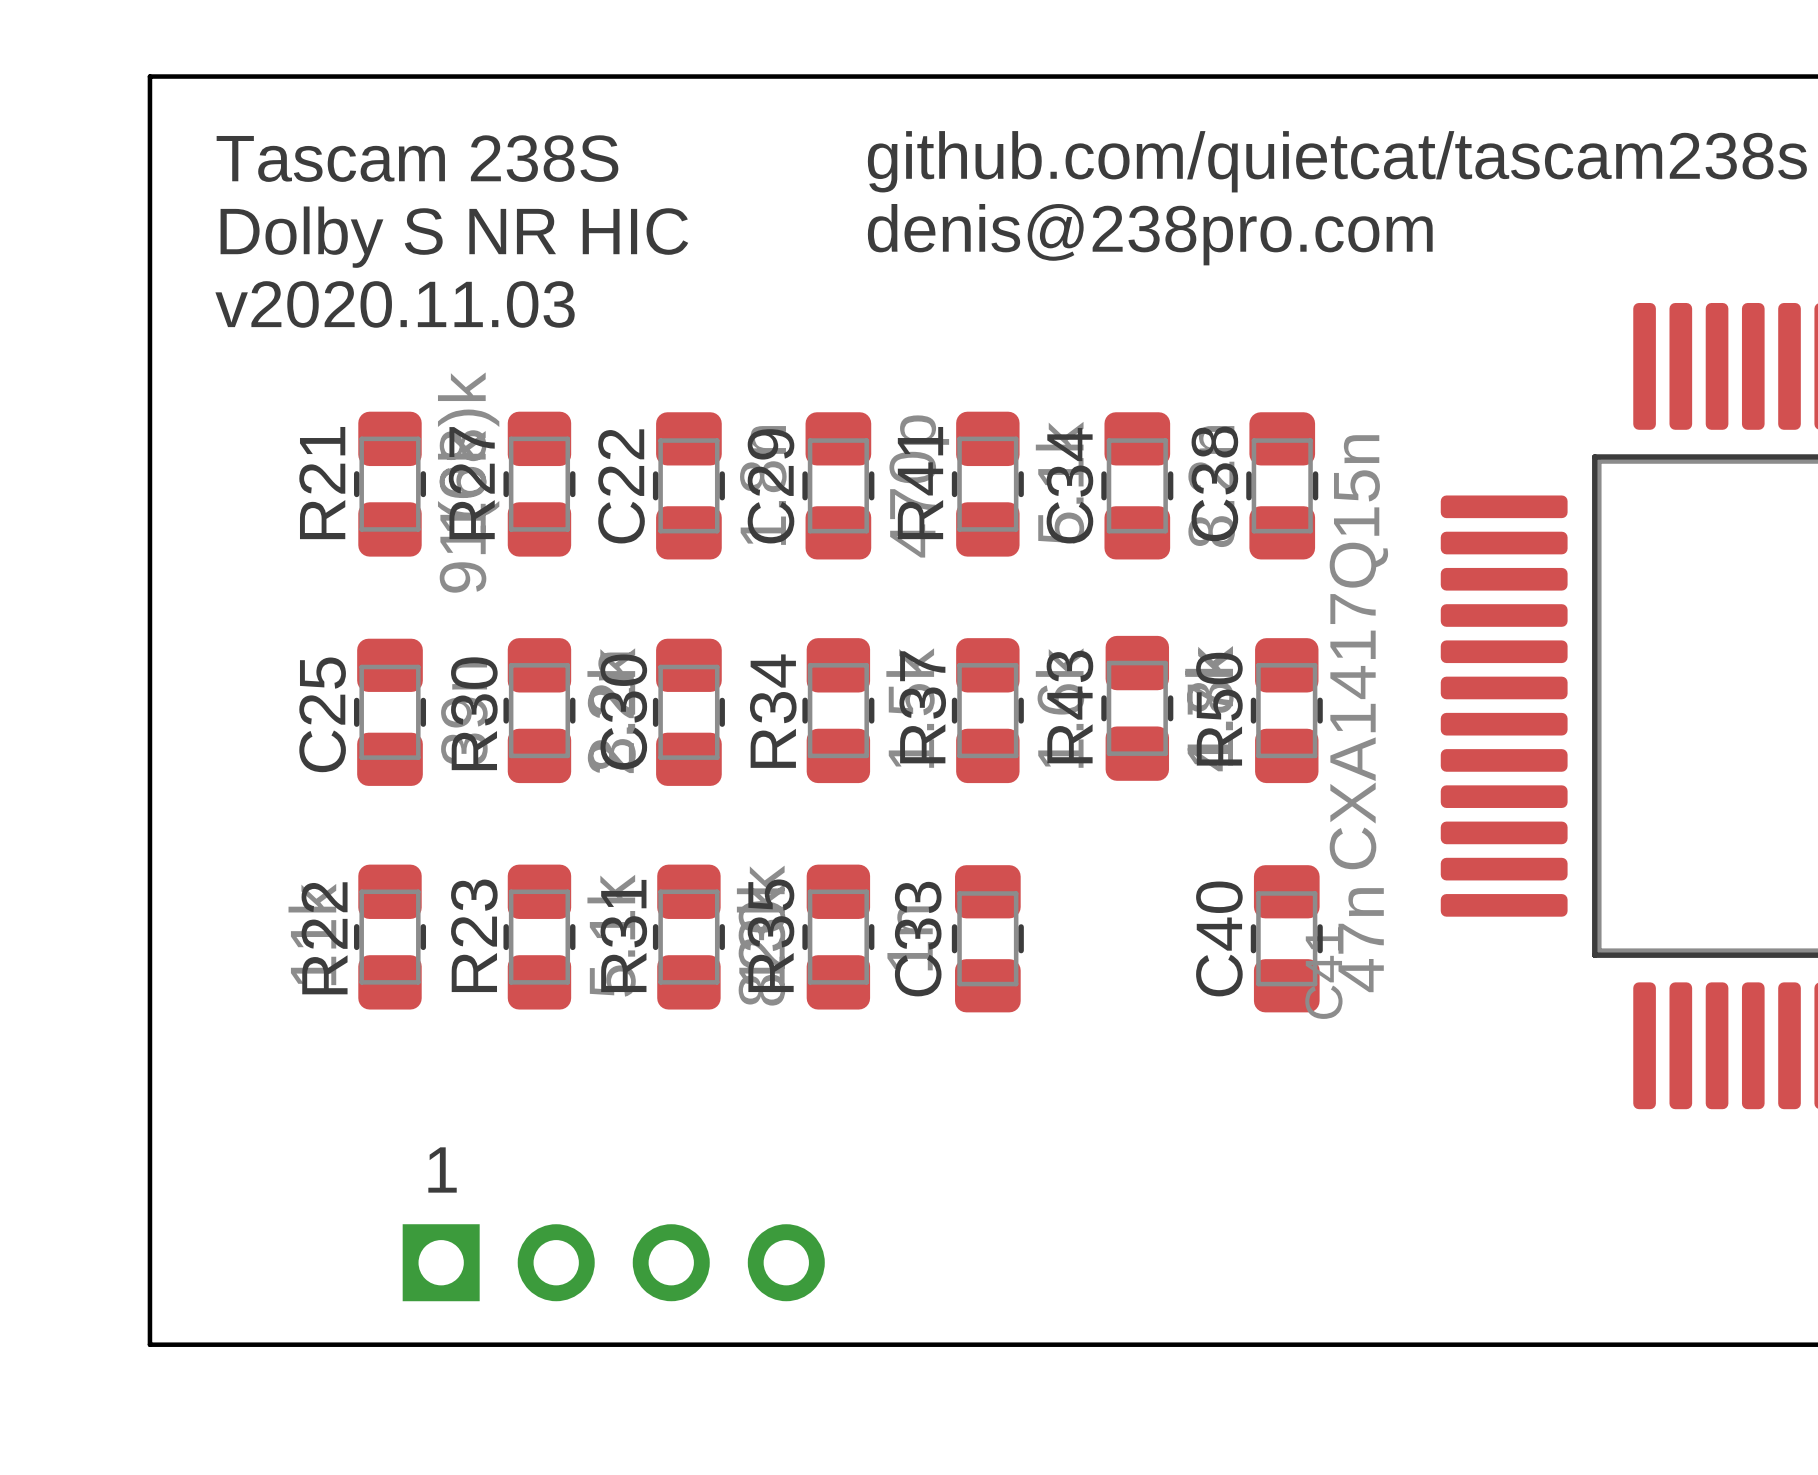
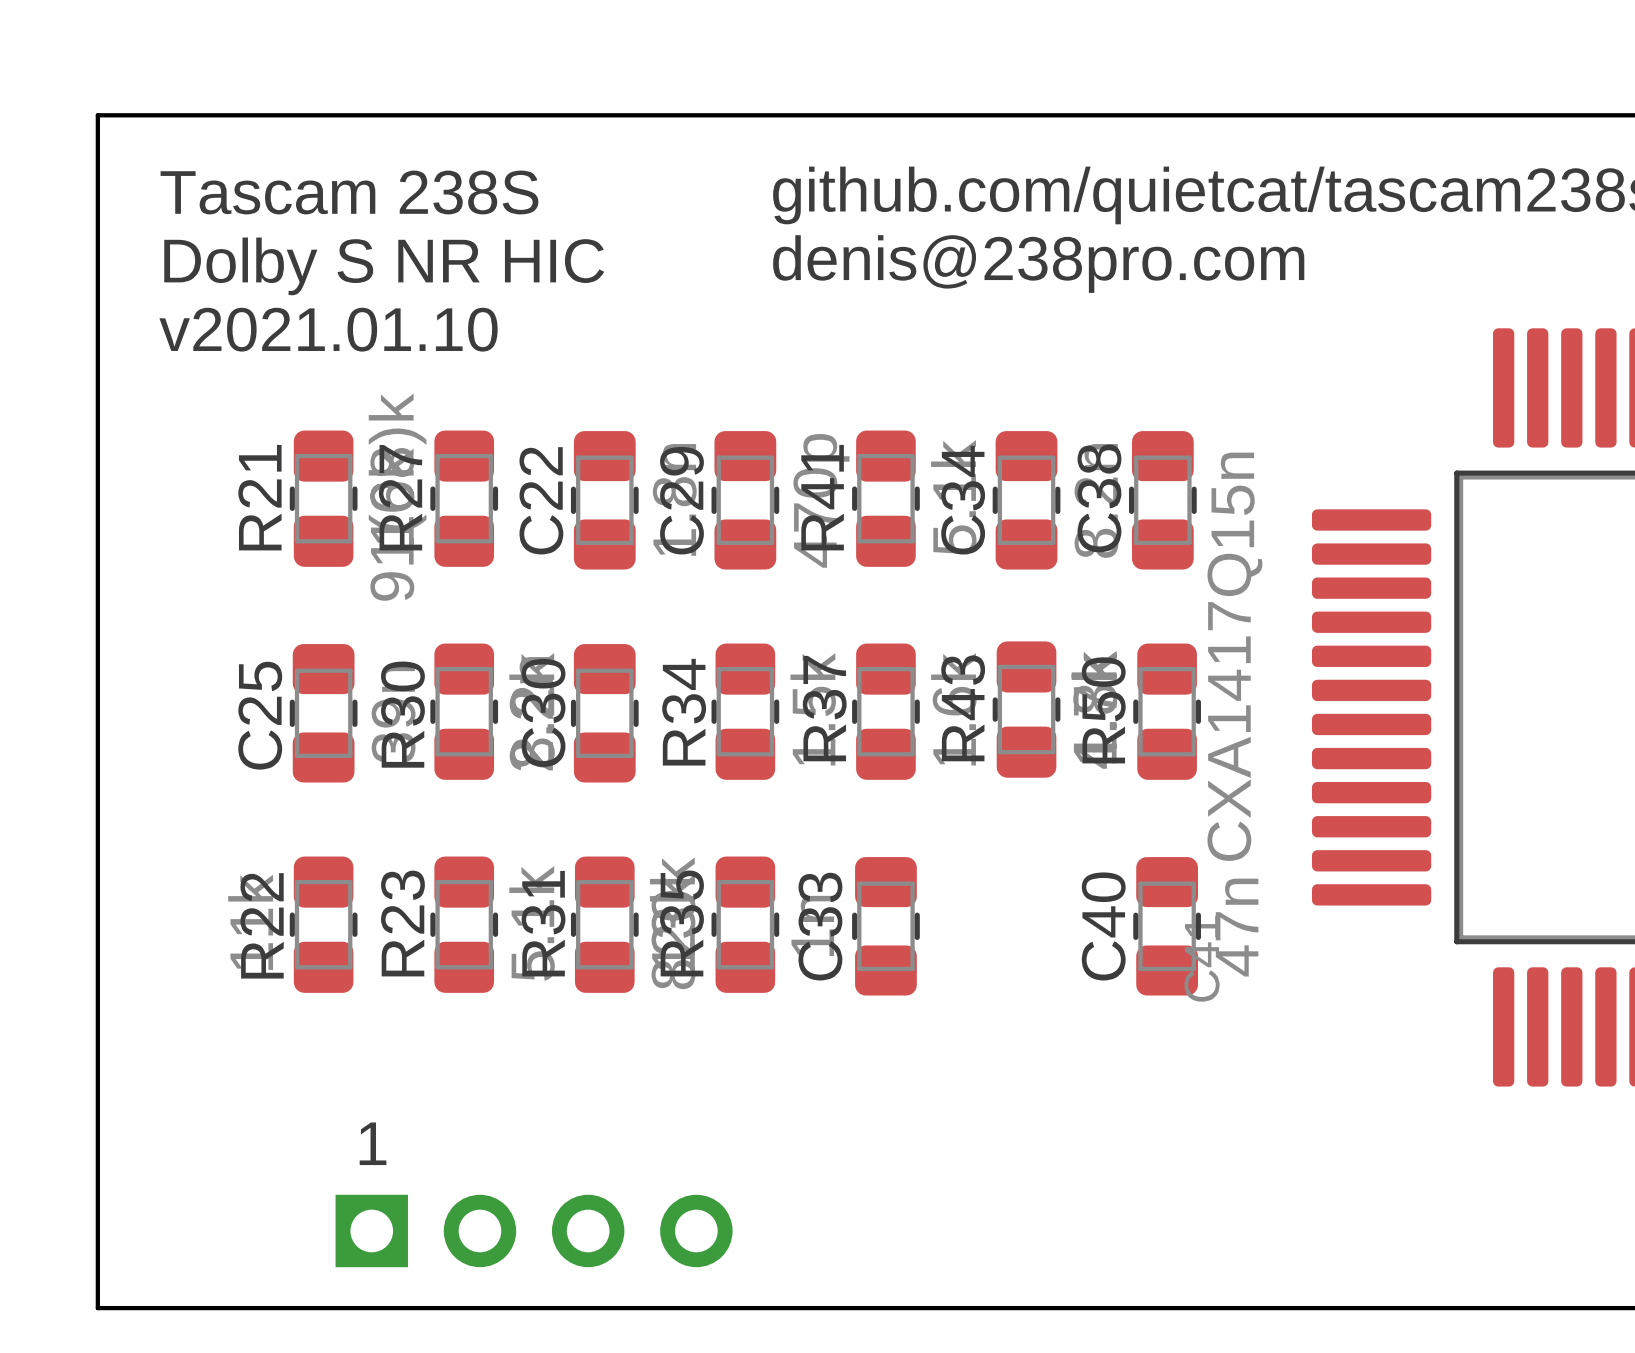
text: v2020.11.03 (395, 304) -> v2021.01.10 (328, 329)

